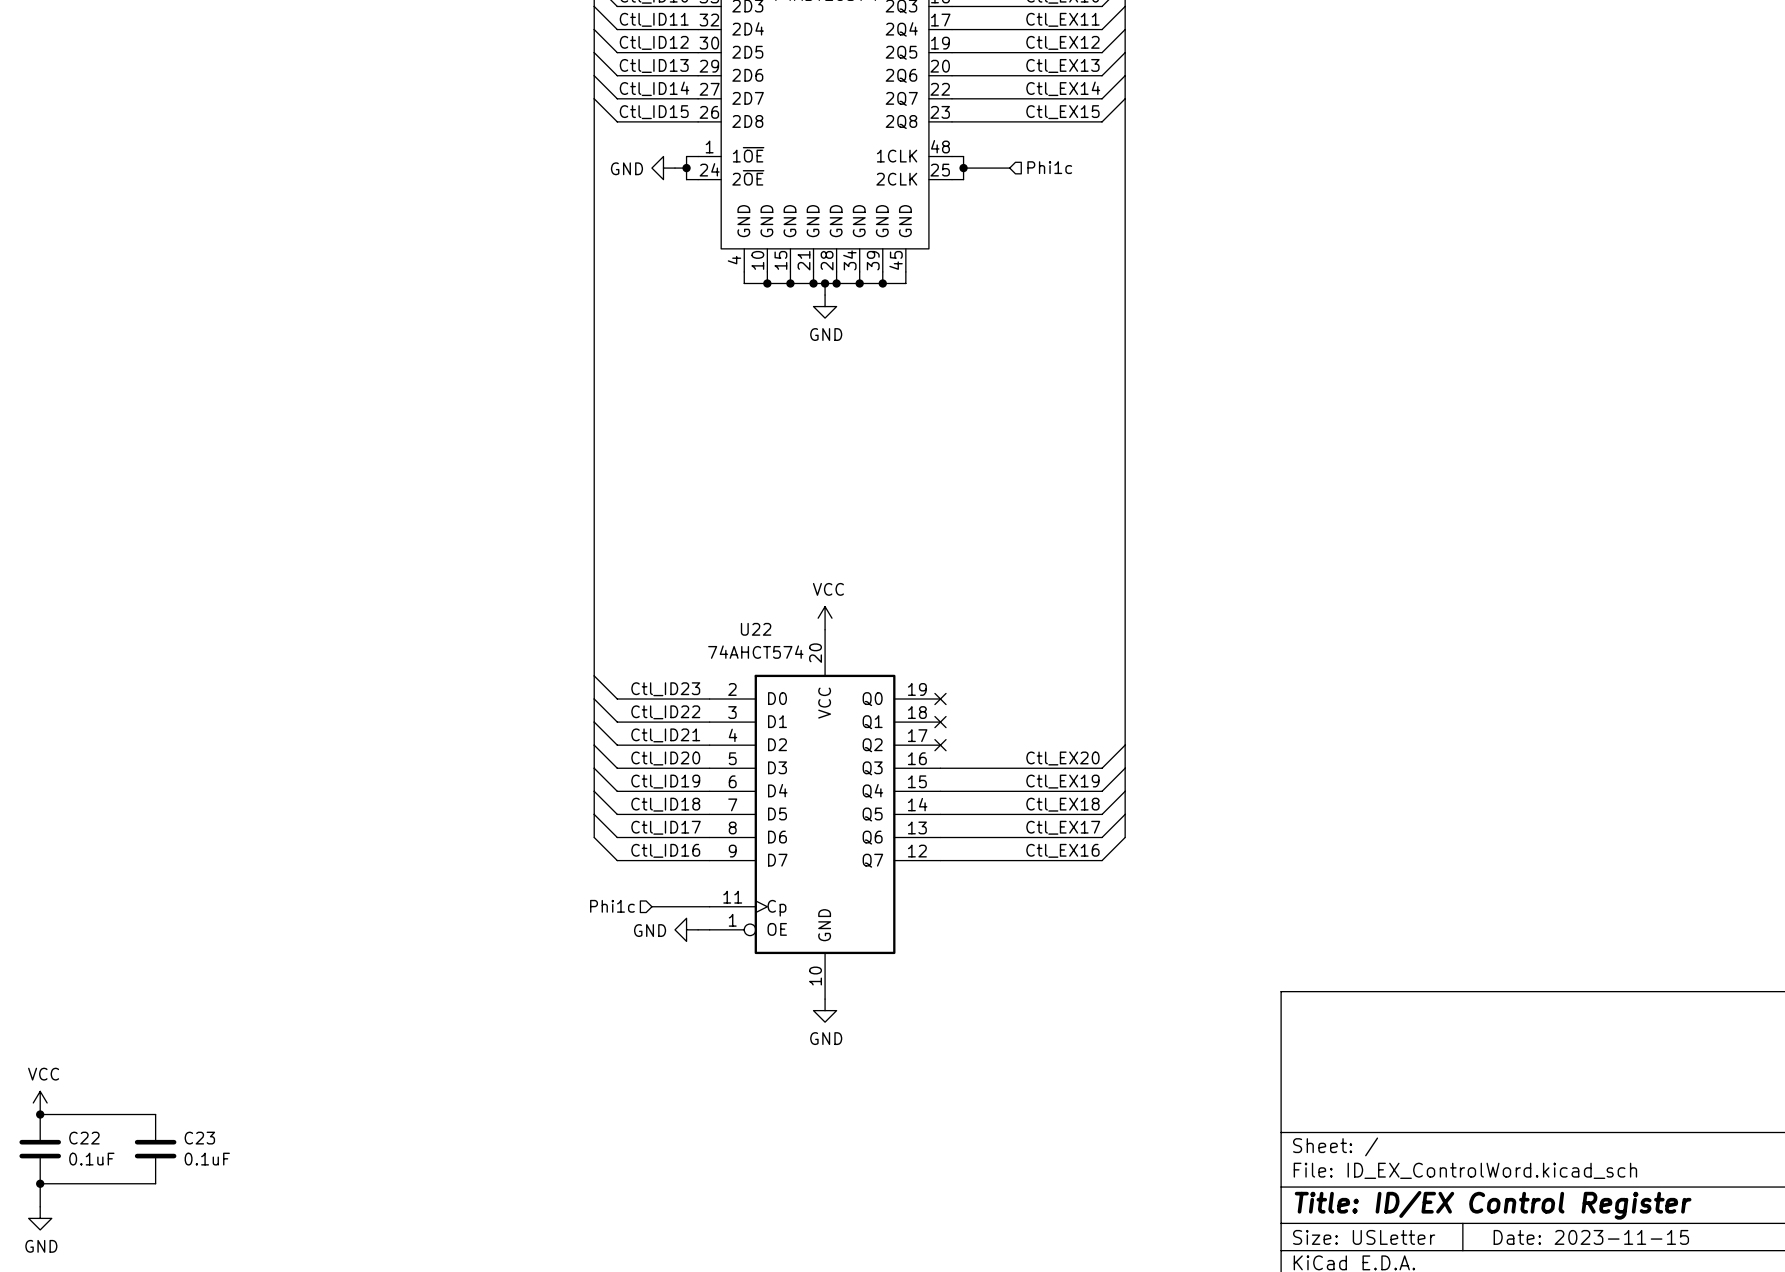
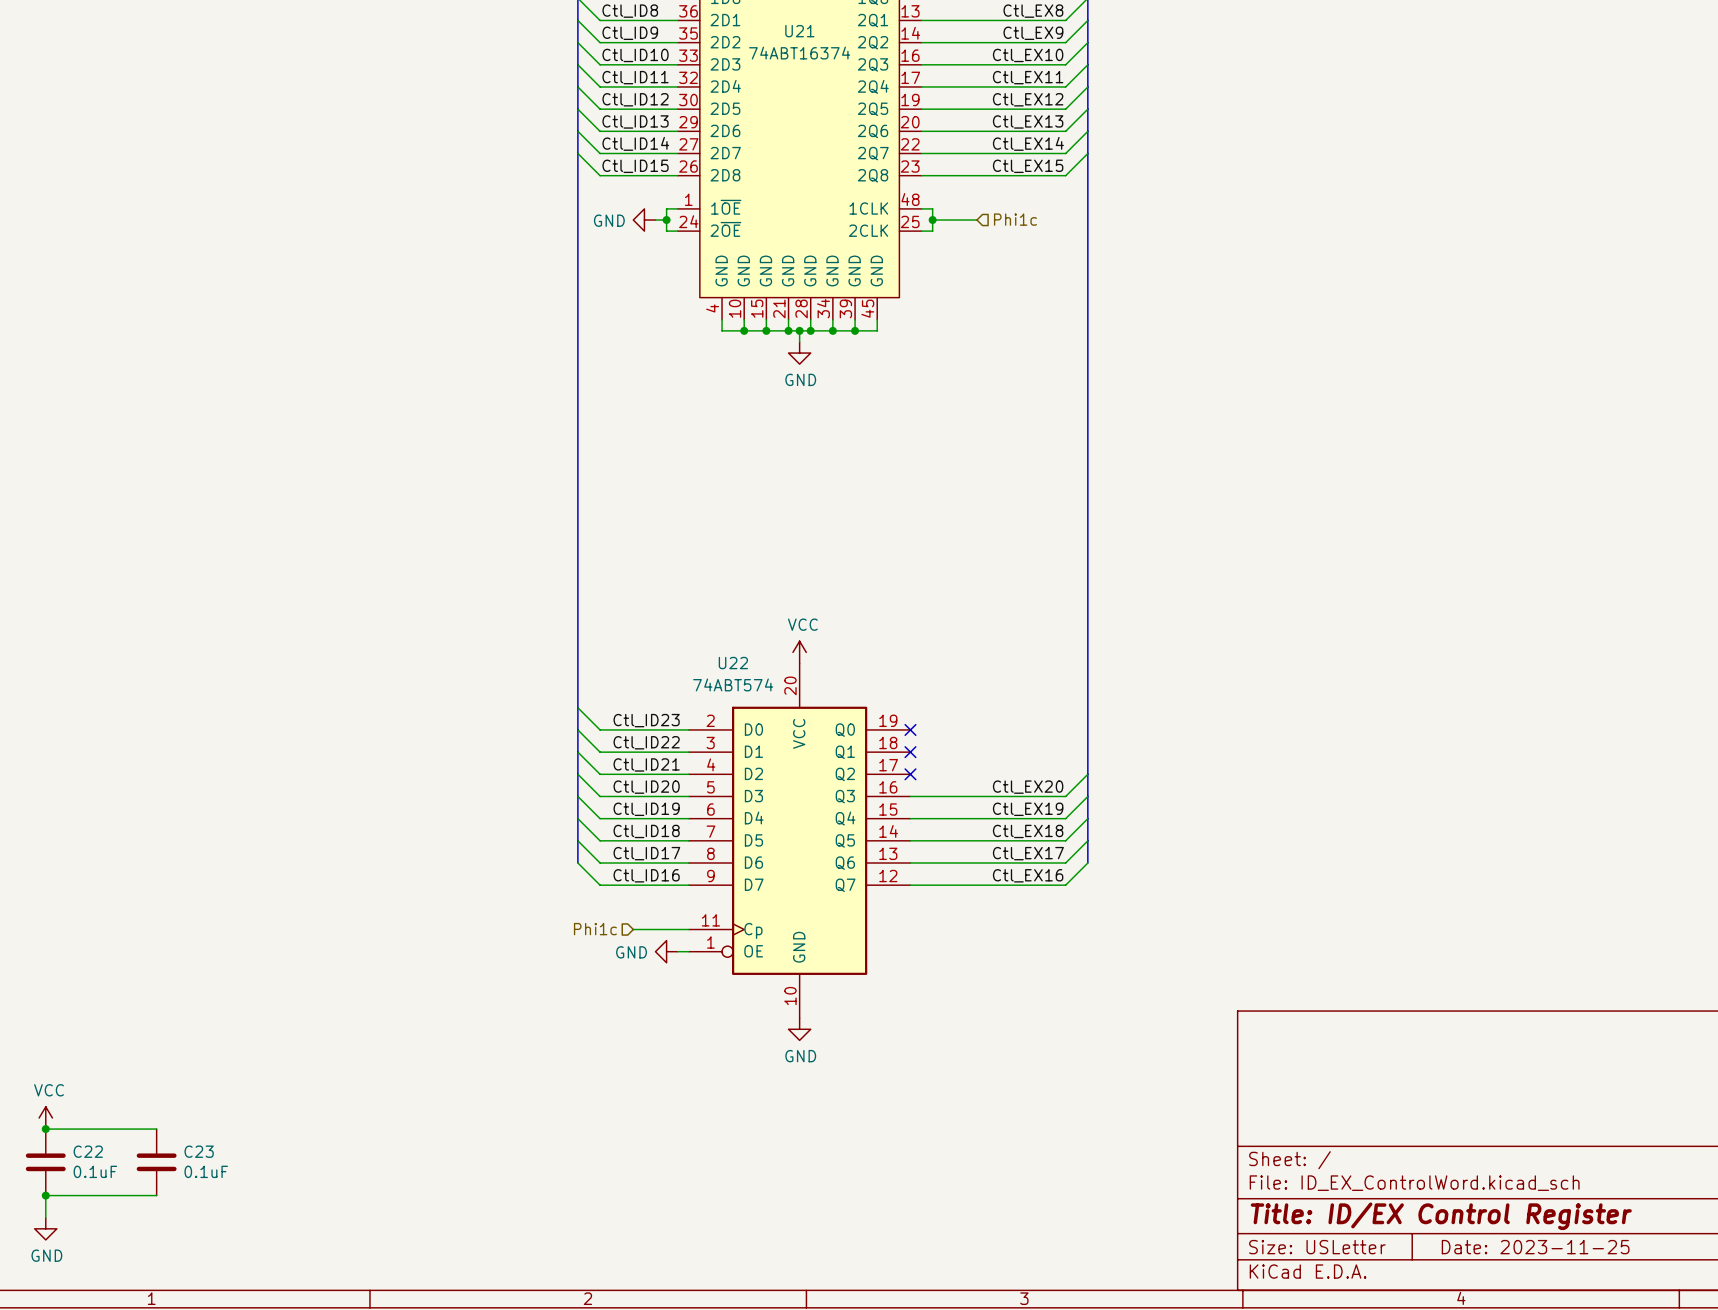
U22 value: 74AHCT574 (755, 652) -> 74ABT574 (733, 684)
title block: Date: 2023-11-15 (1591, 1237) -> Date: 2023-11-25 (1535, 1247)

